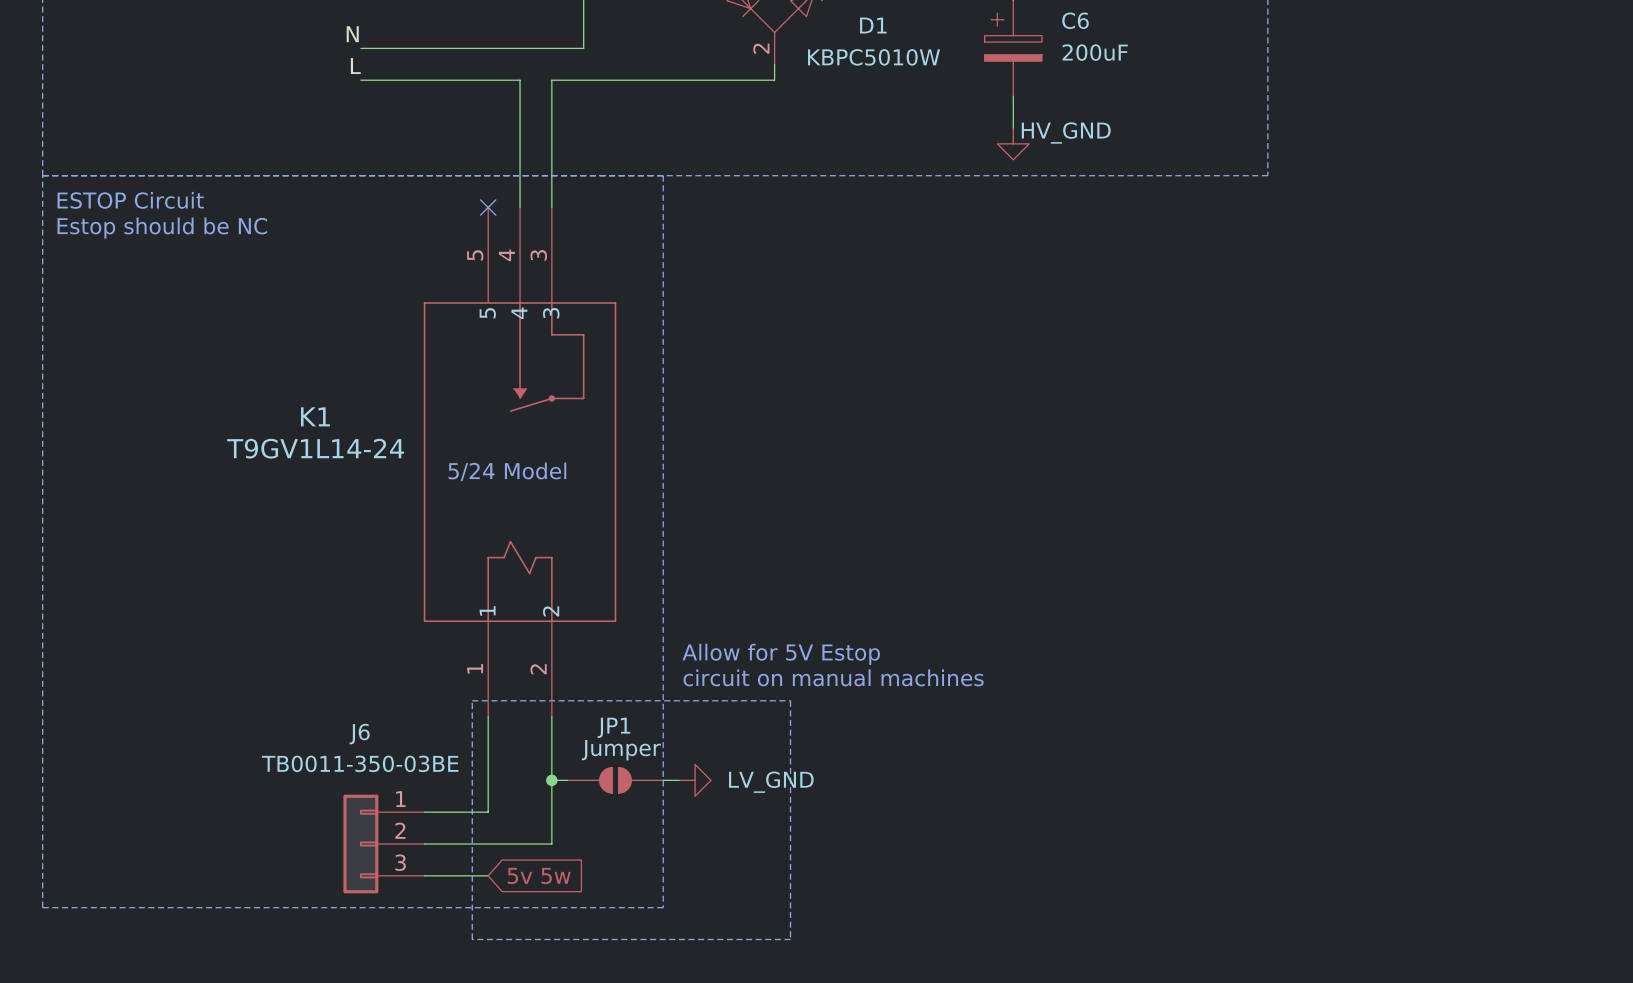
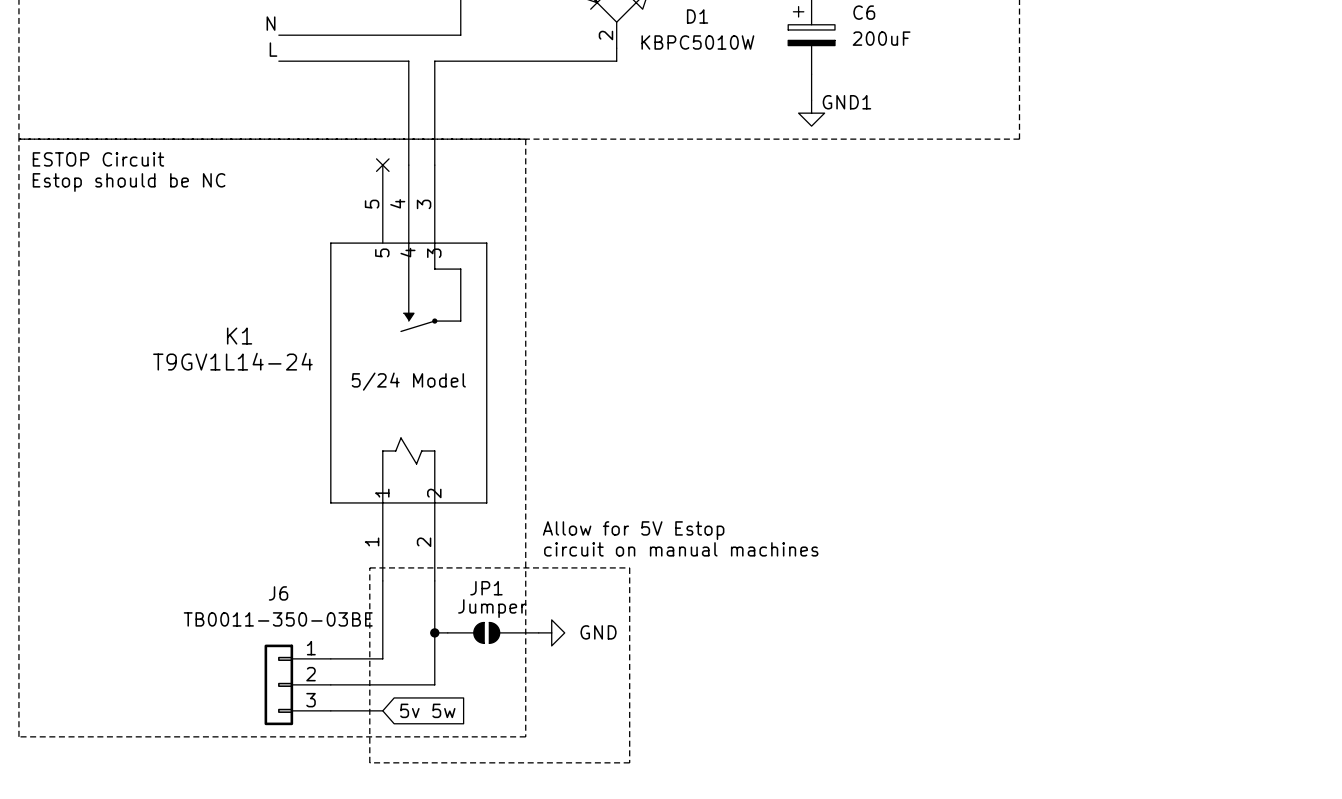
power symbol: HV_GND (1013, 143) -> GND1 (811, 113)
power symbol: LV_GND (695, 780) -> GND (551, 632)

